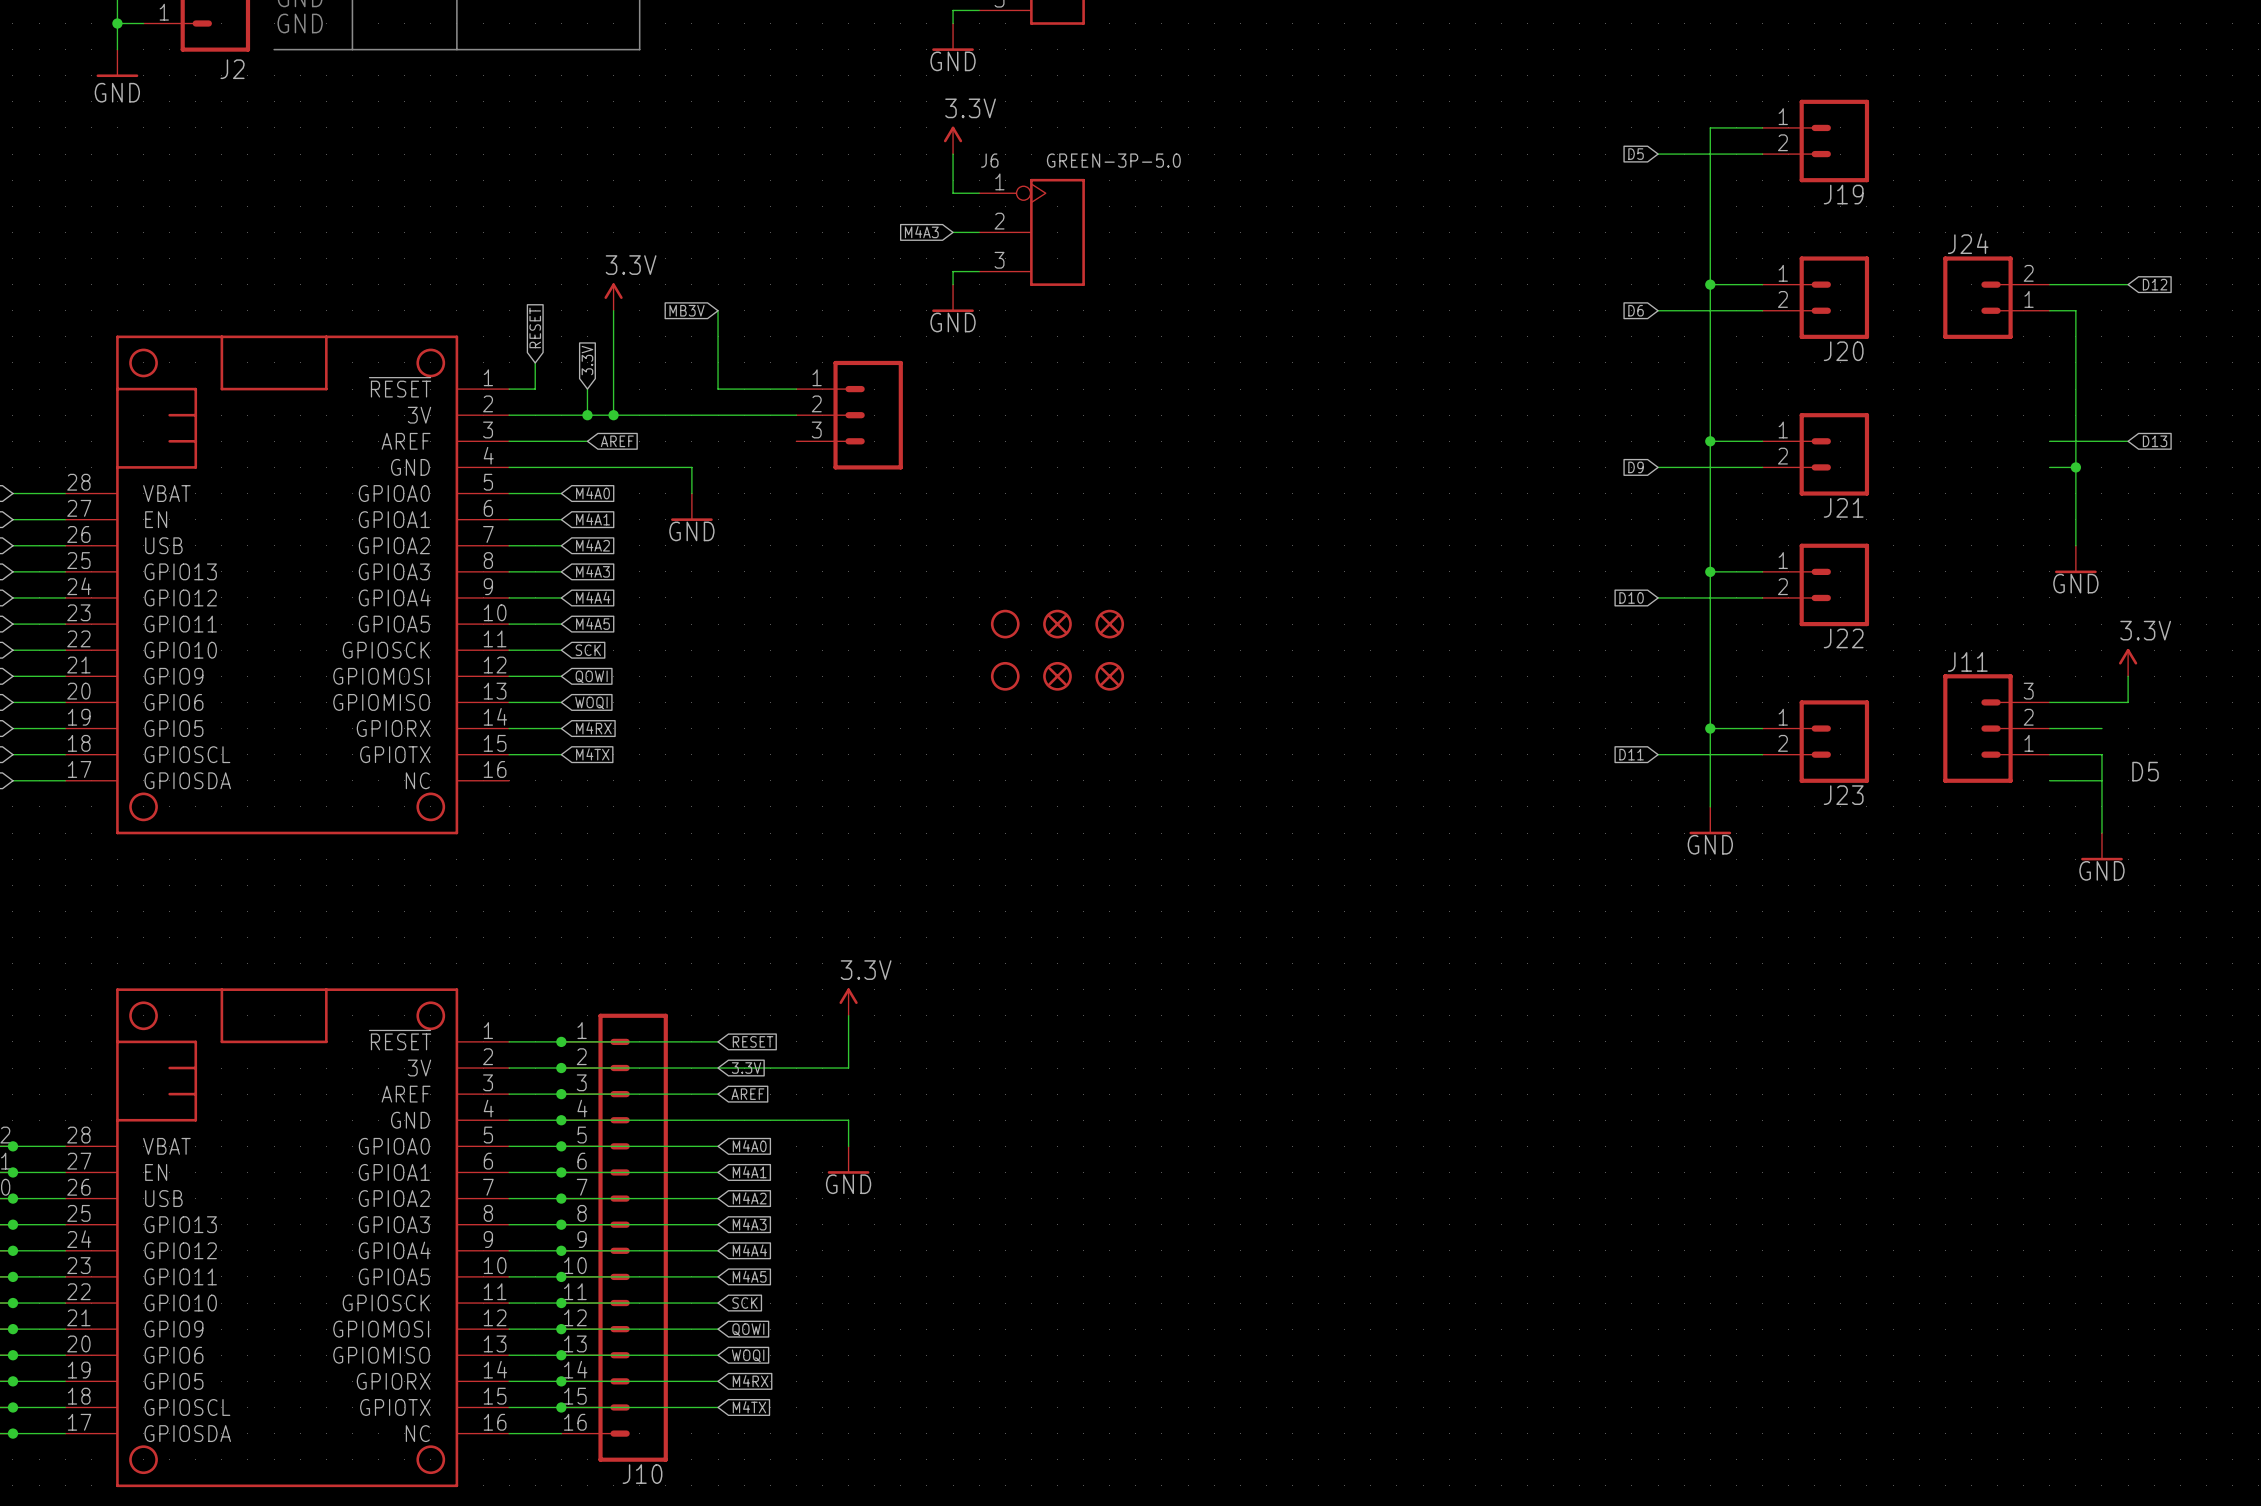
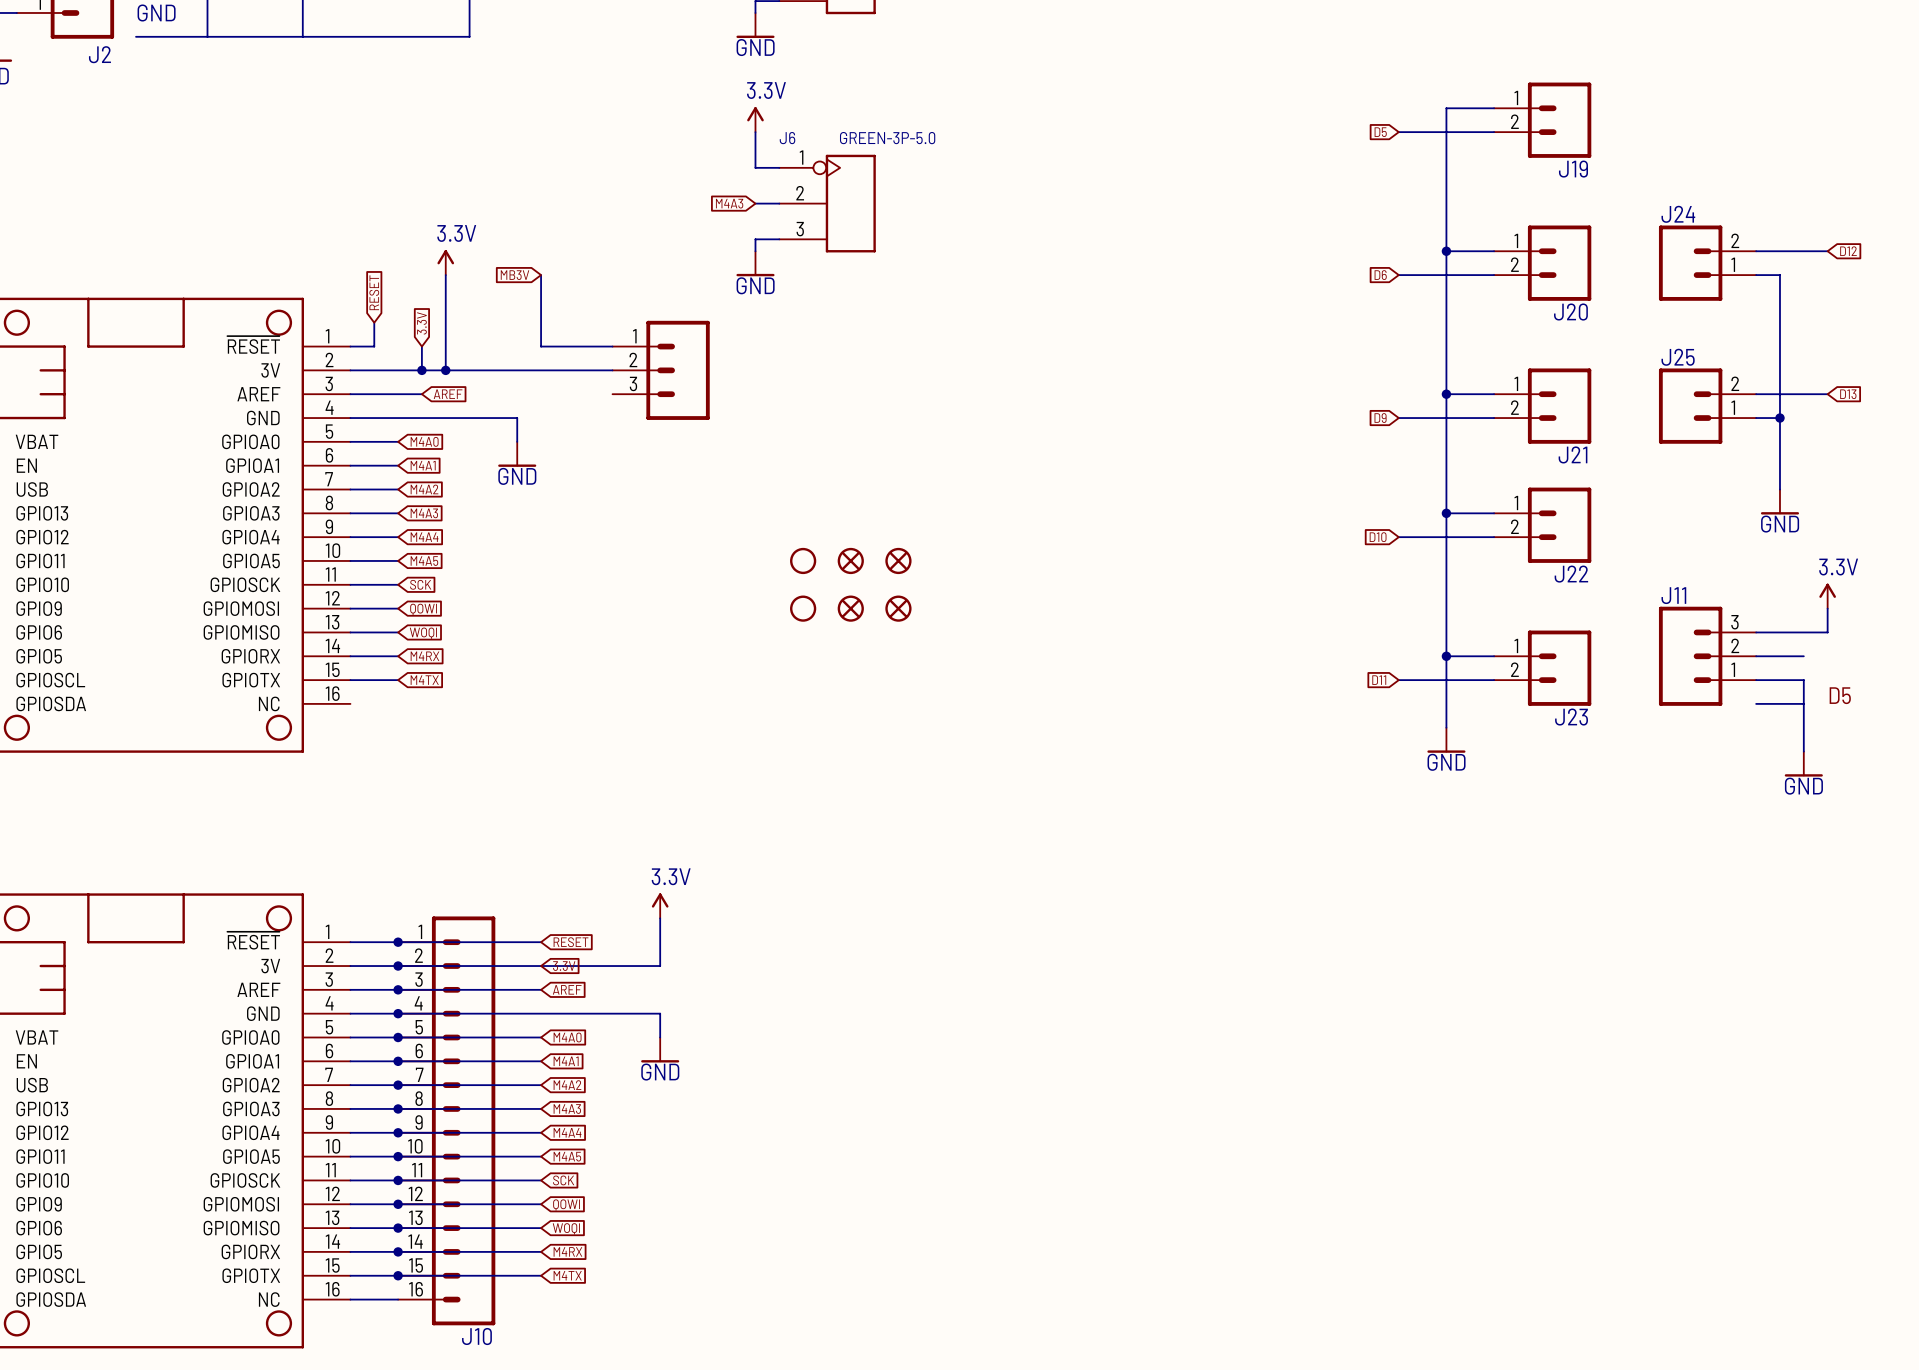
J25: none -> (1707, 406)

